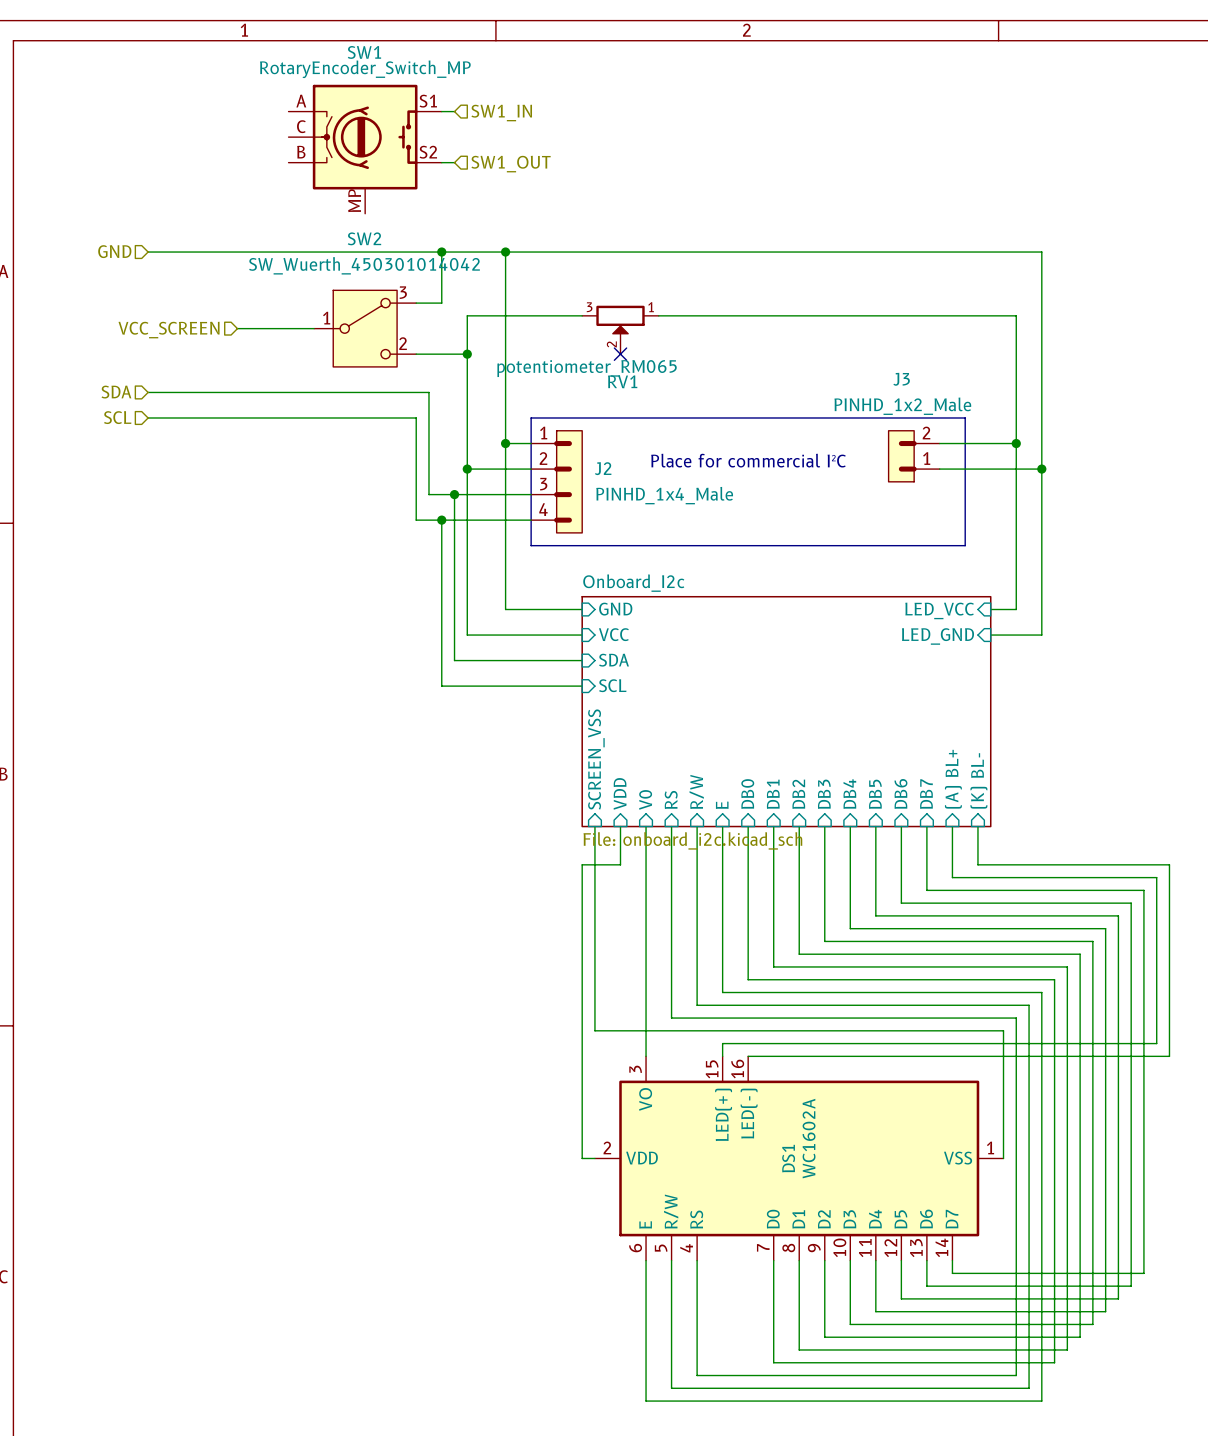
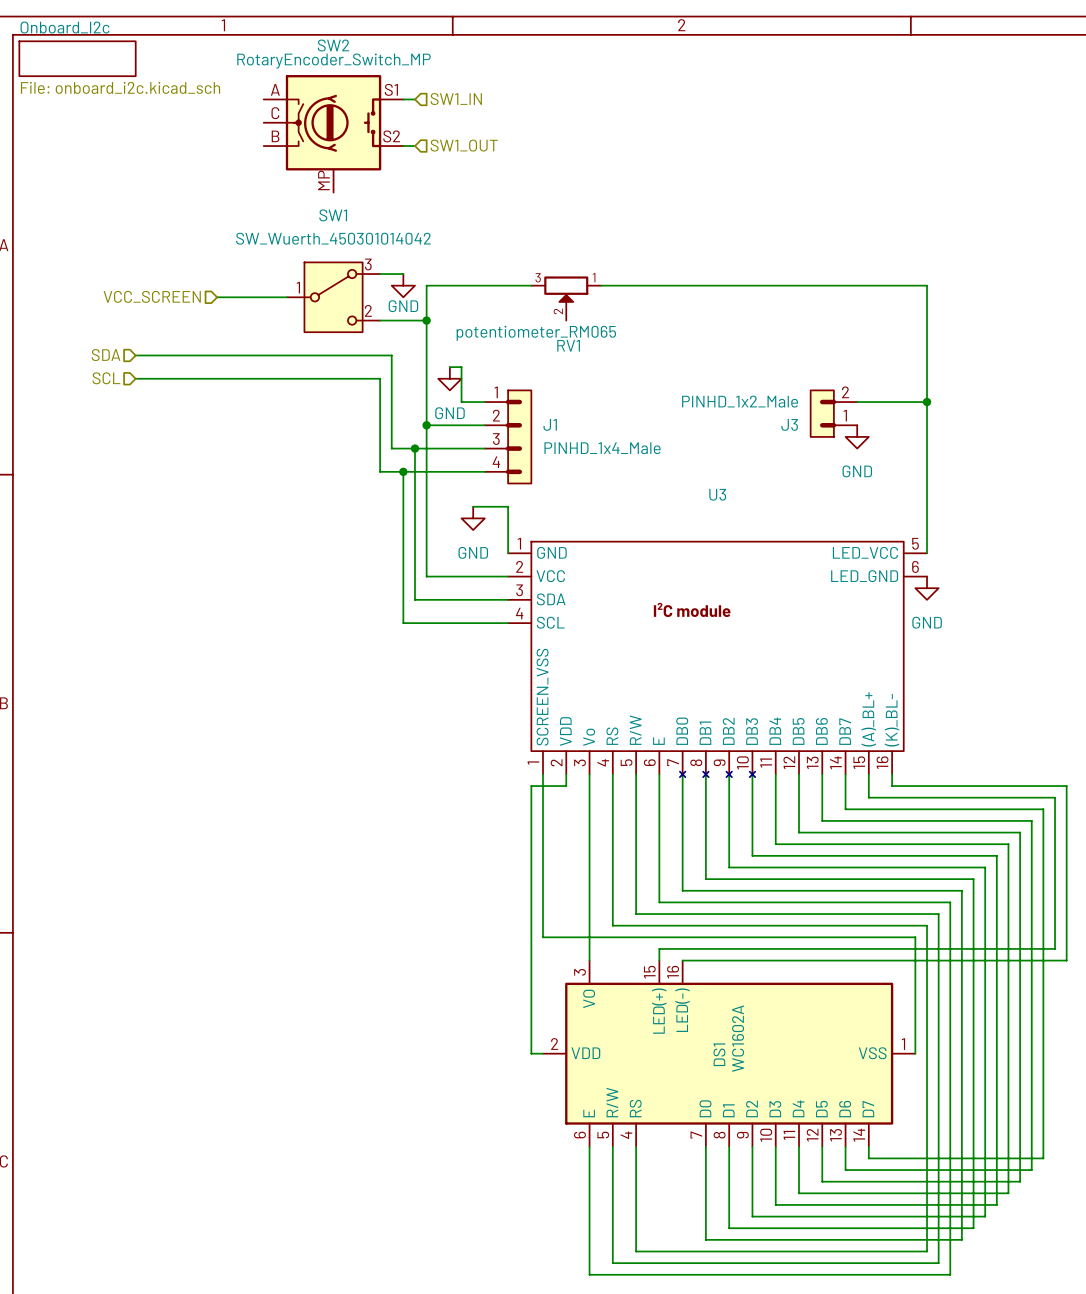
SW1 name: SW1 (364, 52) -> SW2 (333, 45)
SW2 name: SW2 (364, 238) -> SW1 (333, 215)
hierarchical label: GND (114, 251) -> none
wire: (148, 252) (1041, 252) (1041, 635) (990, 635) -> none
wire: (441, 252) (441, 303) -> none
junction: (441, 252) -> none
wire: (505, 252) (505, 405) -> (449, 367) (461, 367)
junction: (505, 252) -> none
power symbol: none -> GND (403, 285)
no-connect mark: (620, 354) -> none
J3 name position: J3 (901, 379) -> J3 (789, 424)
J3 value position: PINHD_1x2_Male (902, 406) -> PINHD_1x2_Male (740, 401)
power symbol: none -> GND (449, 378)
line: (531, 417) (965, 417) (965, 545) (531, 545) (531, 417) -> none
wire: (505, 443) (505, 609) (582, 609) -> none
junction: (505, 443) -> none
text: Place for commercial I²C (748, 460) -> none
J2 name: J2 (603, 468) -> J1 (550, 424)
wire: (939, 469) (1041, 469) -> none
junction: (1041, 469) -> none
power symbol: none -> GND (857, 436)
wire: none -> (473, 506) (508, 506) (508, 553)
power symbol: none -> GND (473, 518)
sheet Onboard_I2c name position: Onboard_I2c (633, 583) -> Onboard_I2c (65, 27)
sheet Onboard_I2c shape: [581, 595, 992, 828] -> [18, 40, 137, 77]
sheet pin: GND (615, 609) -> none
sheet pin: LED_VCC (939, 610) -> none
sheet pin: VCC (613, 634) -> none
sheet pin: LED_GND (937, 636) -> none
power symbol: none -> GND (927, 588)
sheet pin: SDA (614, 660) -> none
sheet pin: SCL (612, 685) -> none
U3: none -> (717, 659)
sheet pin: SCREEN_VSS (596, 759) -> none
sheet pin: (A) BL+ (953, 779) -> none
sheet pin: (K) BL- (978, 780) -> none
sheet pin: R/W (696, 791) -> none
sheet pin: VDD (620, 793) -> none
sheet pin: DB6 (900, 793) -> none
sheet pin: DB0 (747, 794) -> none
sheet pin: DB1 (773, 794) -> none
sheet pin: DB2 (798, 794) -> none
sheet pin: DB3 (824, 794) -> none
sheet pin: DB4 (849, 794) -> none
sheet pin: DB5 (875, 794) -> none
sheet pin: DB7 (926, 794) -> none
sheet pin: V0 (645, 799) -> none
sheet pin: RS (671, 799) -> none
sheet pin: E (722, 805) -> none
sheet Onboard_I2c value position: File: onboard_i2c.kicad_sch (692, 840) -> File: onboard_i2c.kicad_sch (120, 87)

